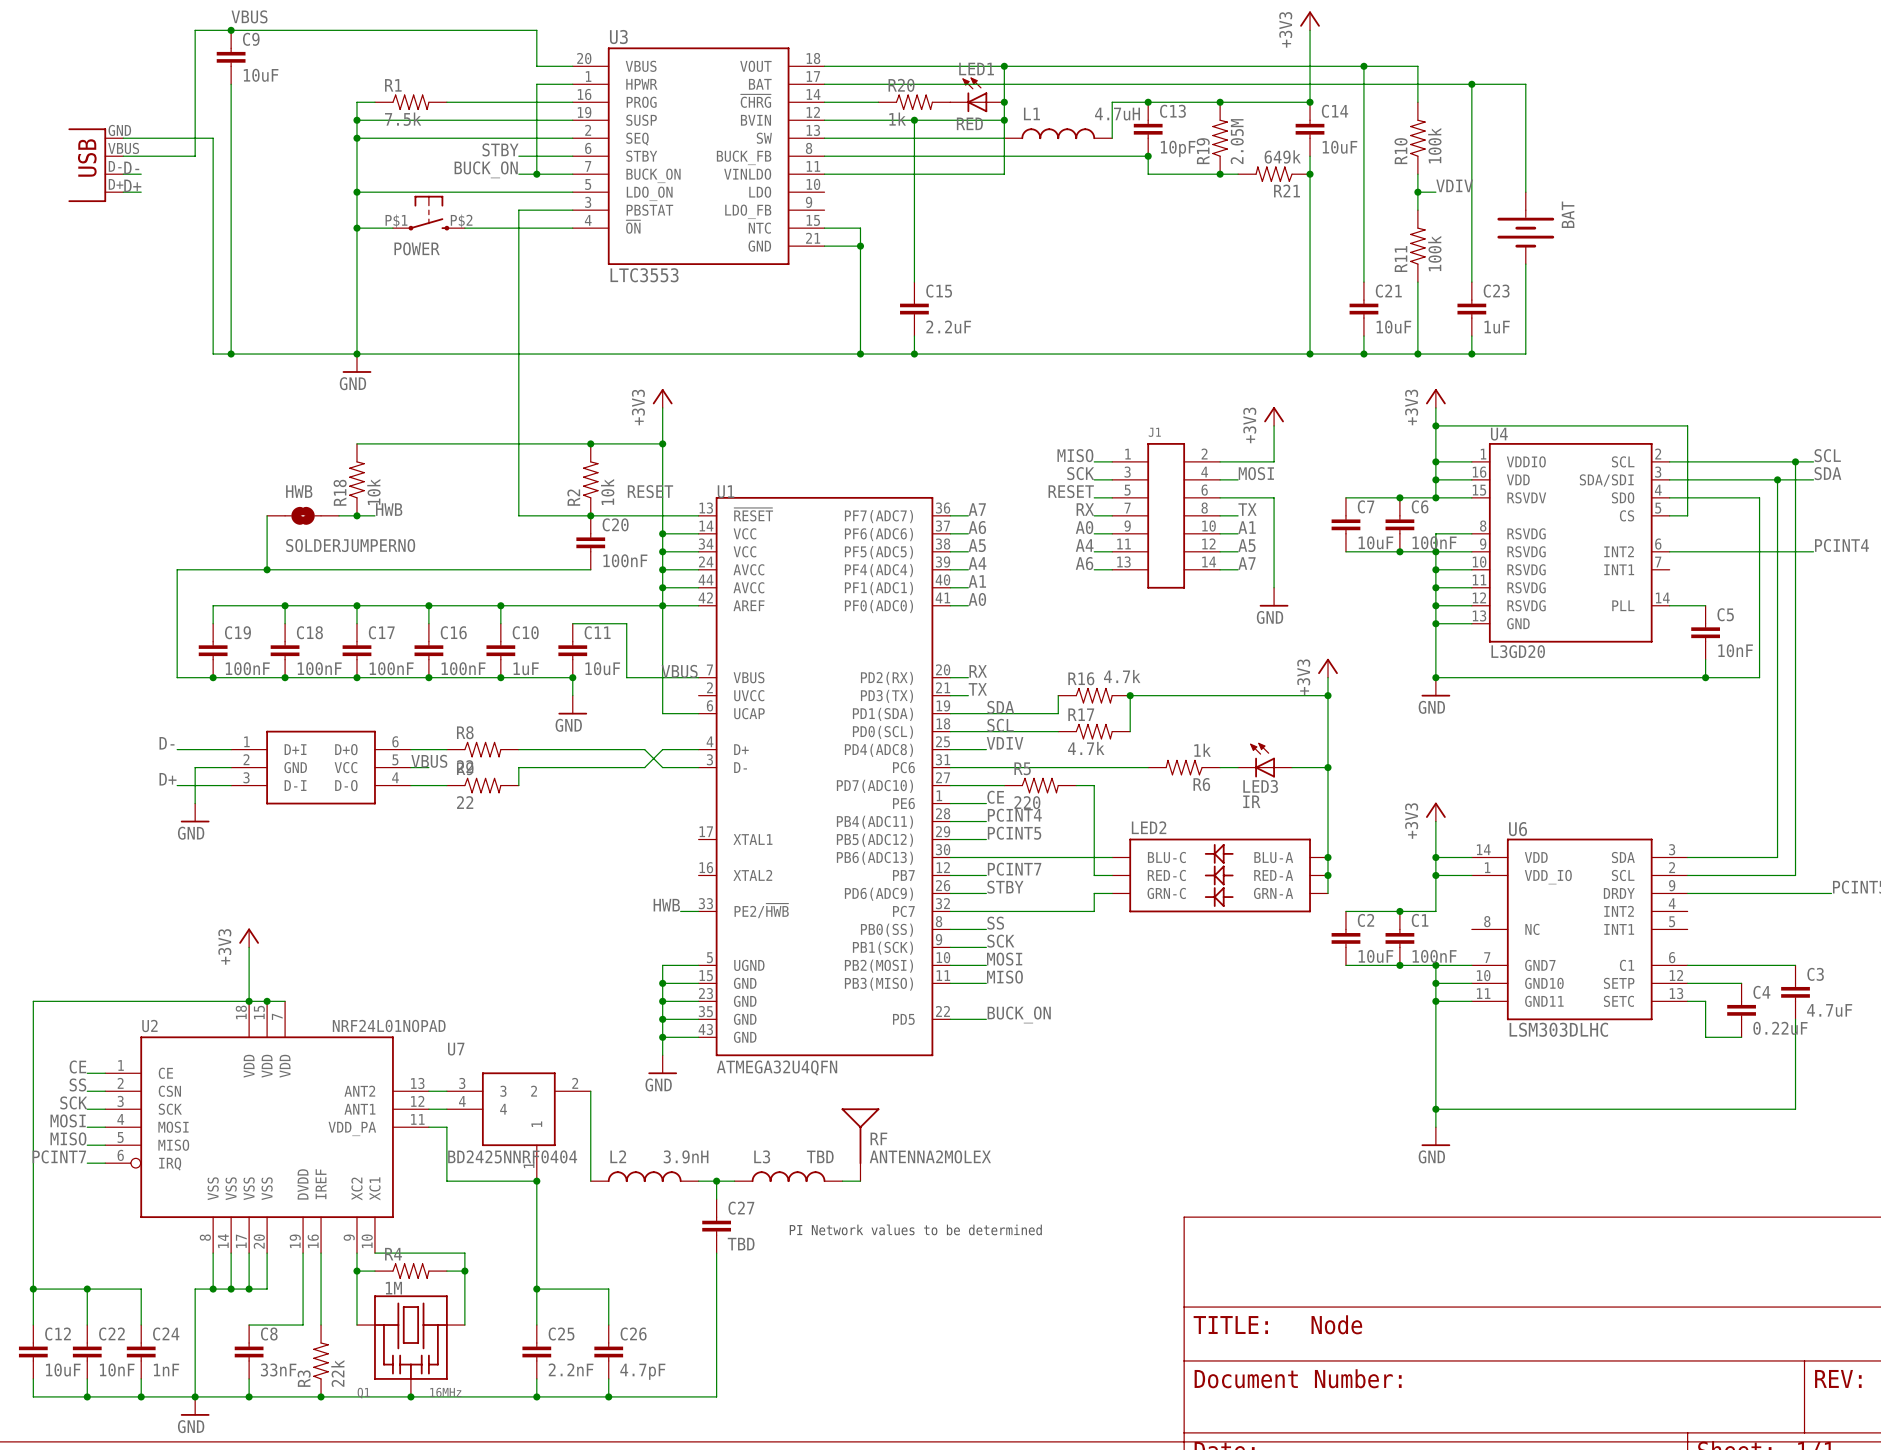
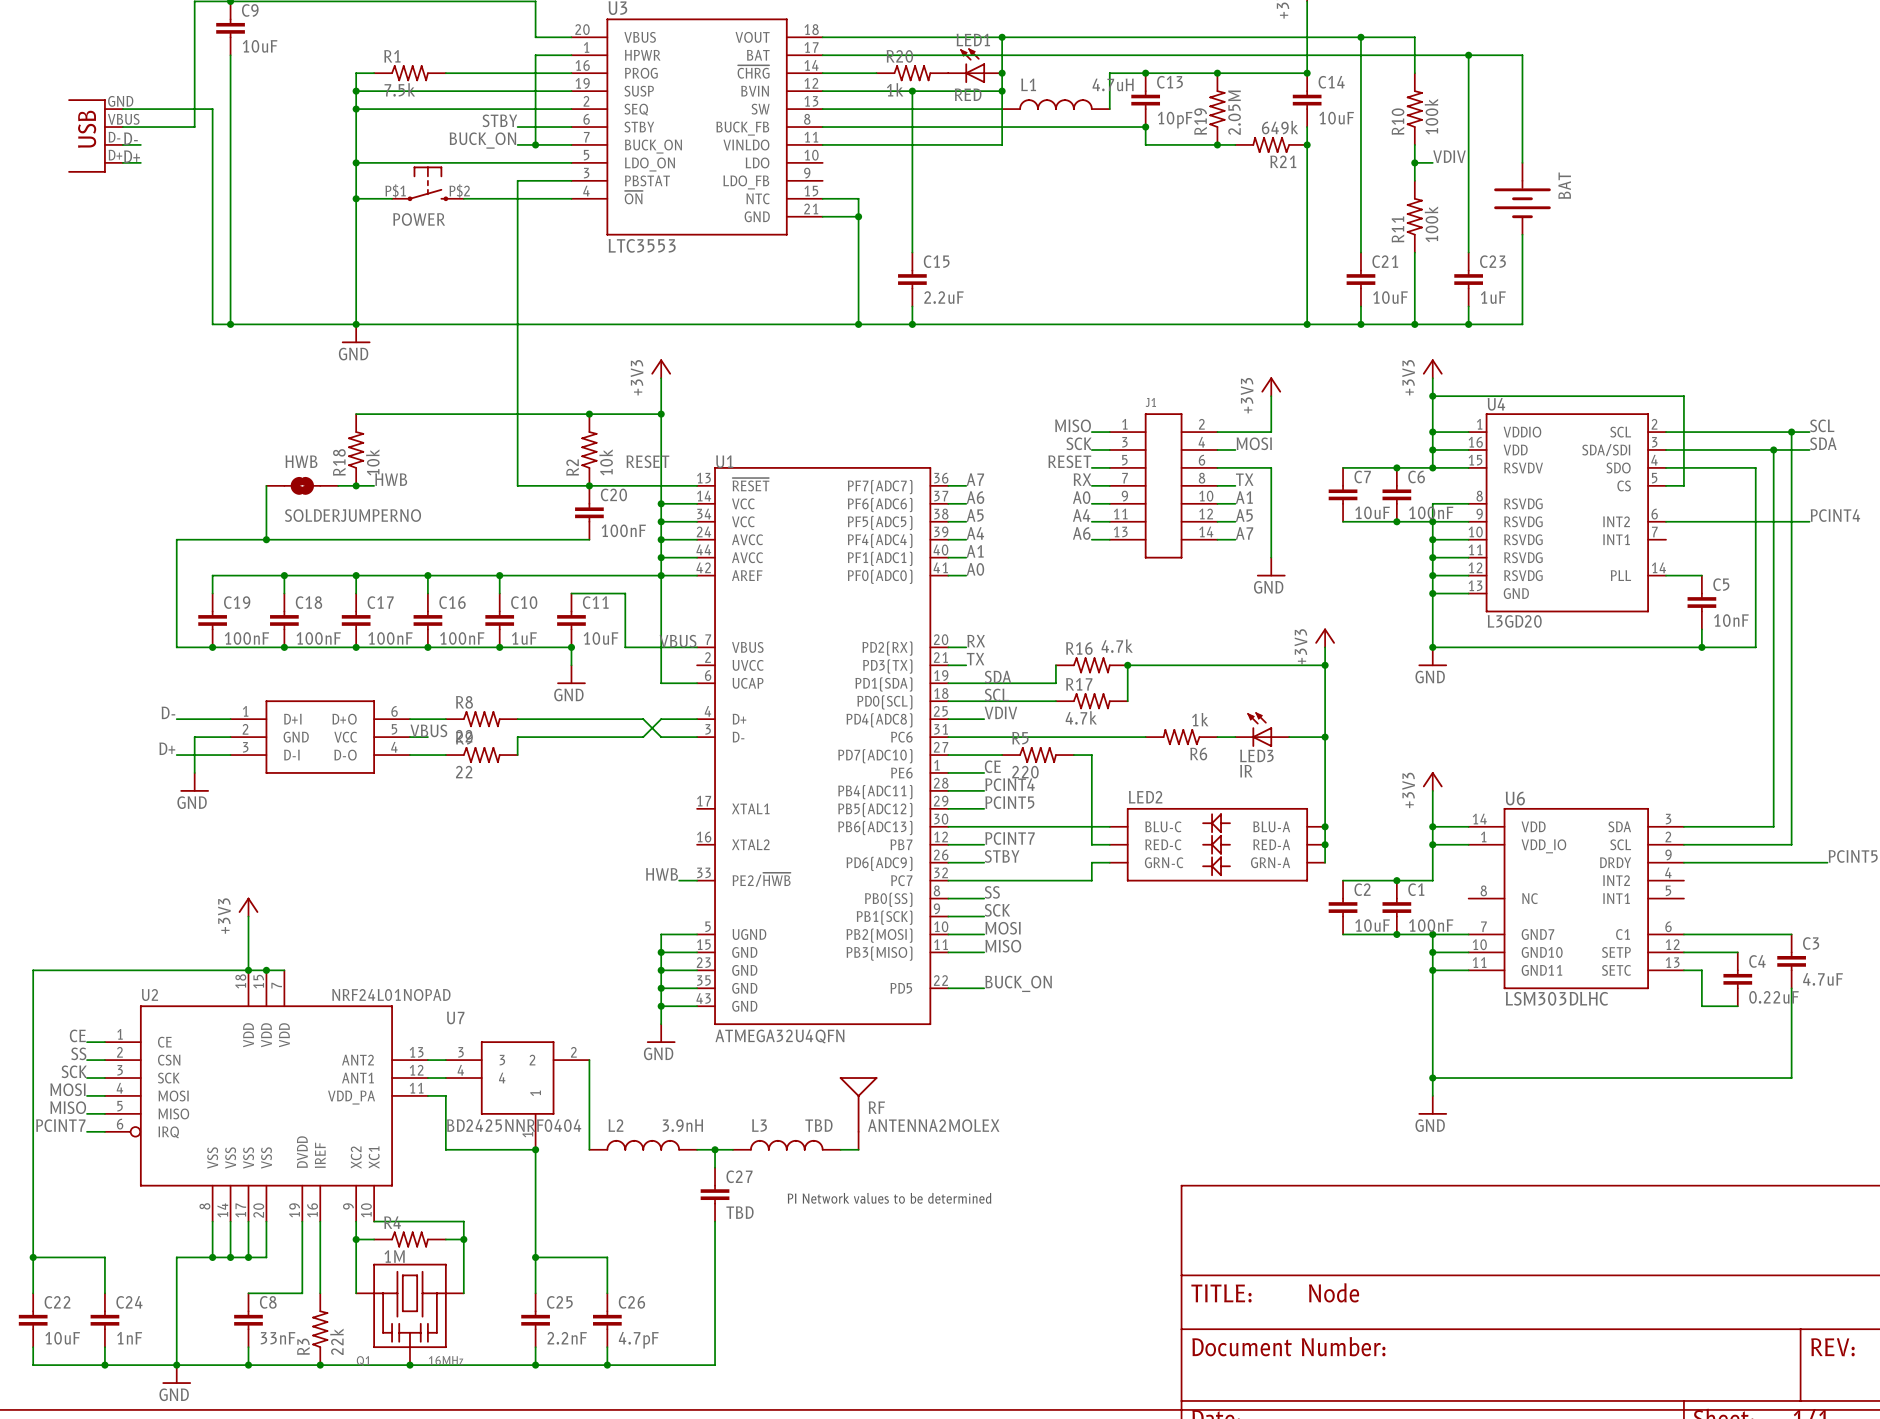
wire: (87, 1289) (87, 1325) -> none
junction: (87, 1289) -> none
wire: (105, 1289) (141, 1289) (141, 1325) -> (104, 1257) (104, 1293)
wire: (195, 1289) (195, 1396) -> (194, 1257) (176, 1257) (176, 1365)
C12 name: C12 (58, 1334) -> C22 (57, 1302)
C22: 10nF (87, 1351) -> none
C24 position: (141, 1351) -> (104, 1320)
wire: (87, 1378) (87, 1396) -> (104, 1347) (104, 1365)
wire: (141, 1378) (141, 1396) -> none
junction: (87, 1396) -> none
junction: none -> (104, 1365)
junction: (141, 1396) -> none
junction: none -> (176, 1365)
junction: (195, 1396) -> none
power symbol position: GND (195, 1406) -> GND (176, 1374)

